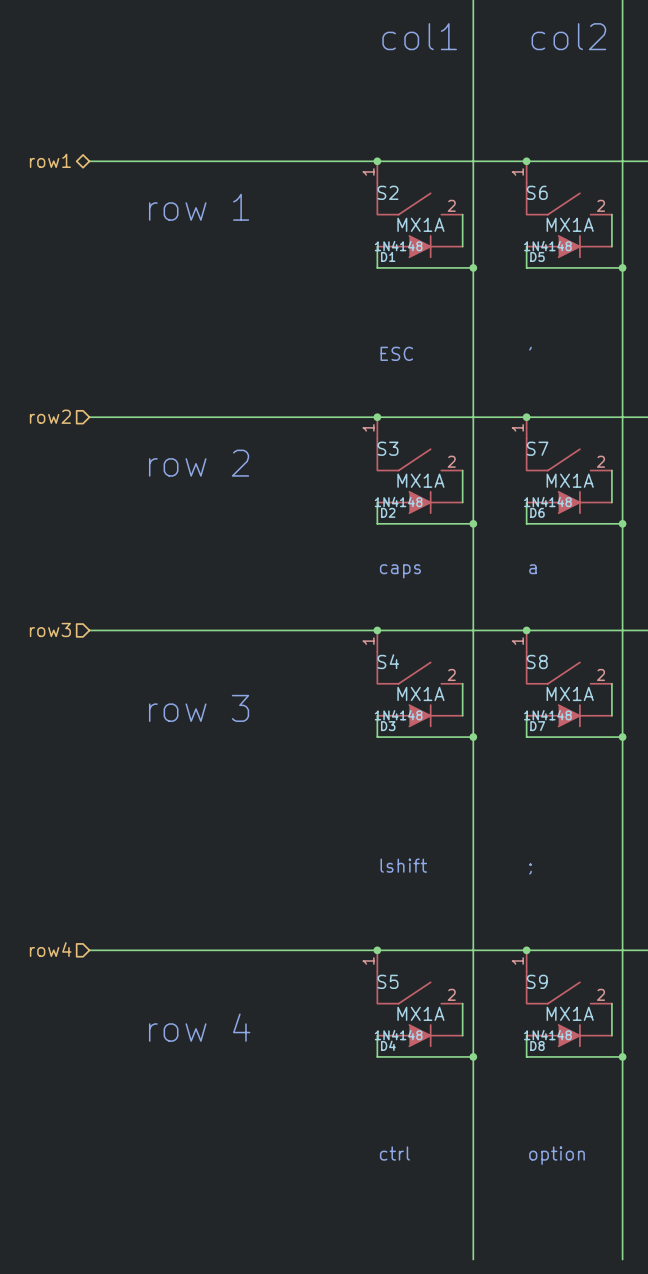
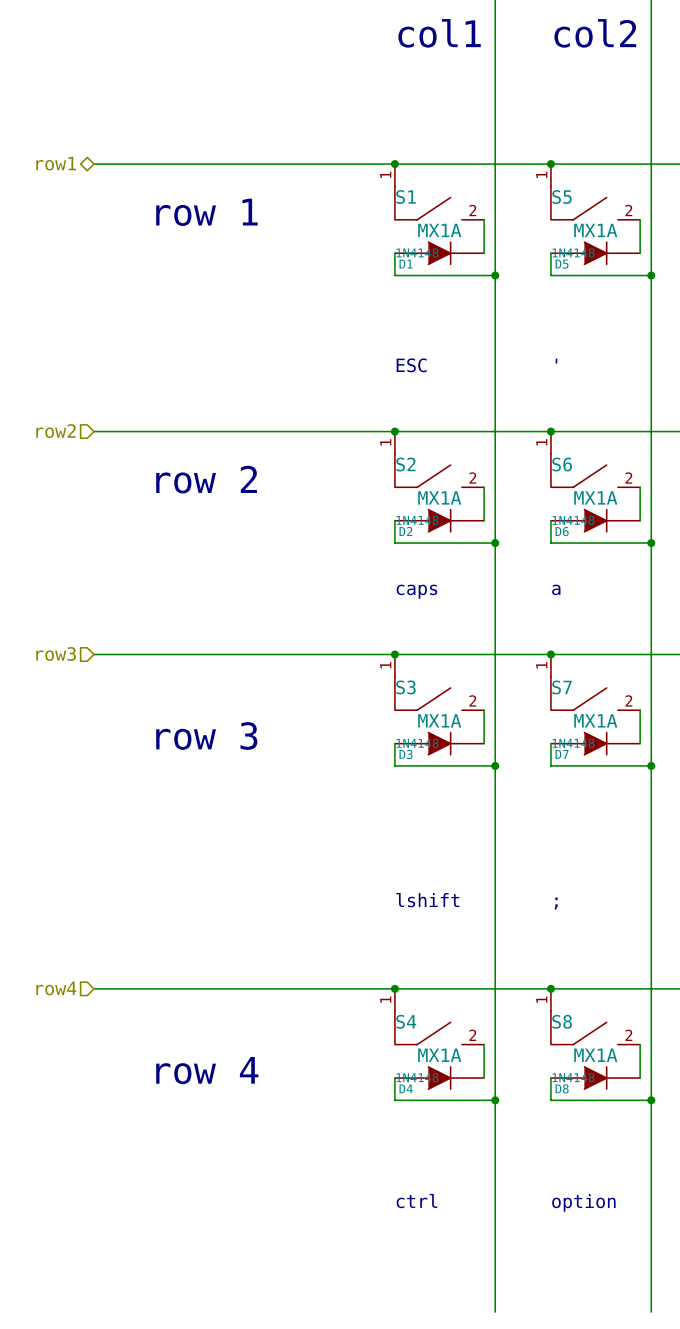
S2 name: S2 (388, 192) -> S1 (406, 197)
S6 name: S6 (537, 192) -> S5 (561, 197)
S3 name: S3 (388, 448) -> S2 (405, 464)
S7 name: S7 (537, 448) -> S6 (562, 464)
S4 name: S4 (388, 661) -> S3 (405, 687)
S8 name: S8 (537, 661) -> S7 (562, 687)
S5 name: S5 (388, 981) -> S4 (406, 1021)
S9 name: S9 (537, 981) -> S8 (562, 1021)

